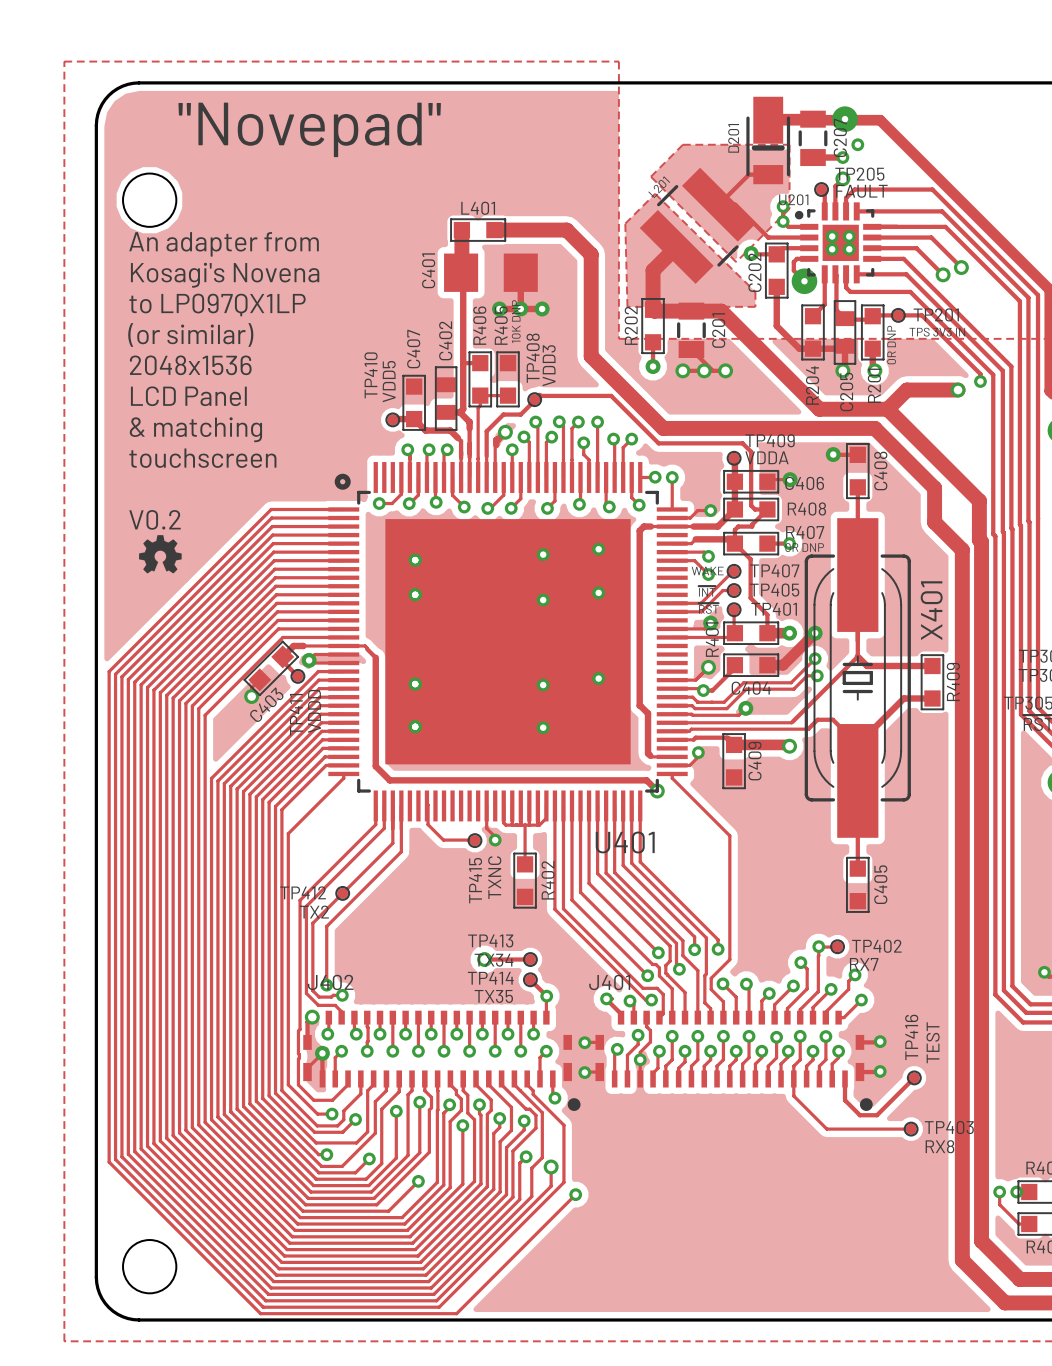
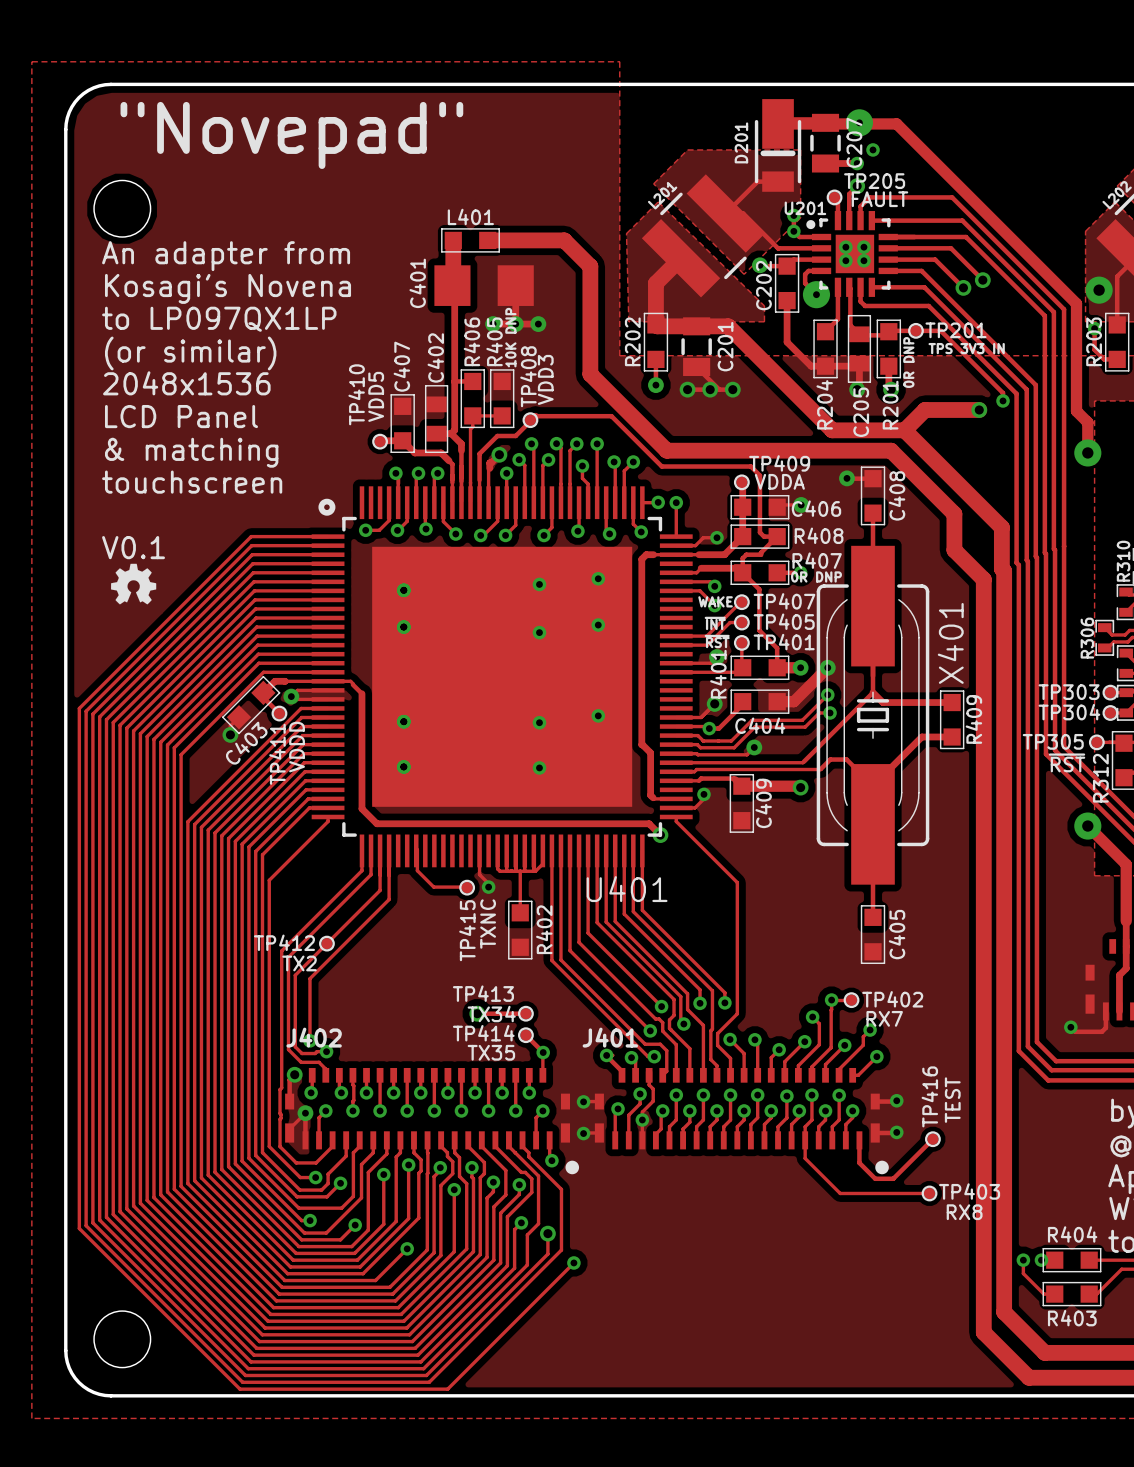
text: V0.2 (155, 519) -> V0.1 (133, 547)

